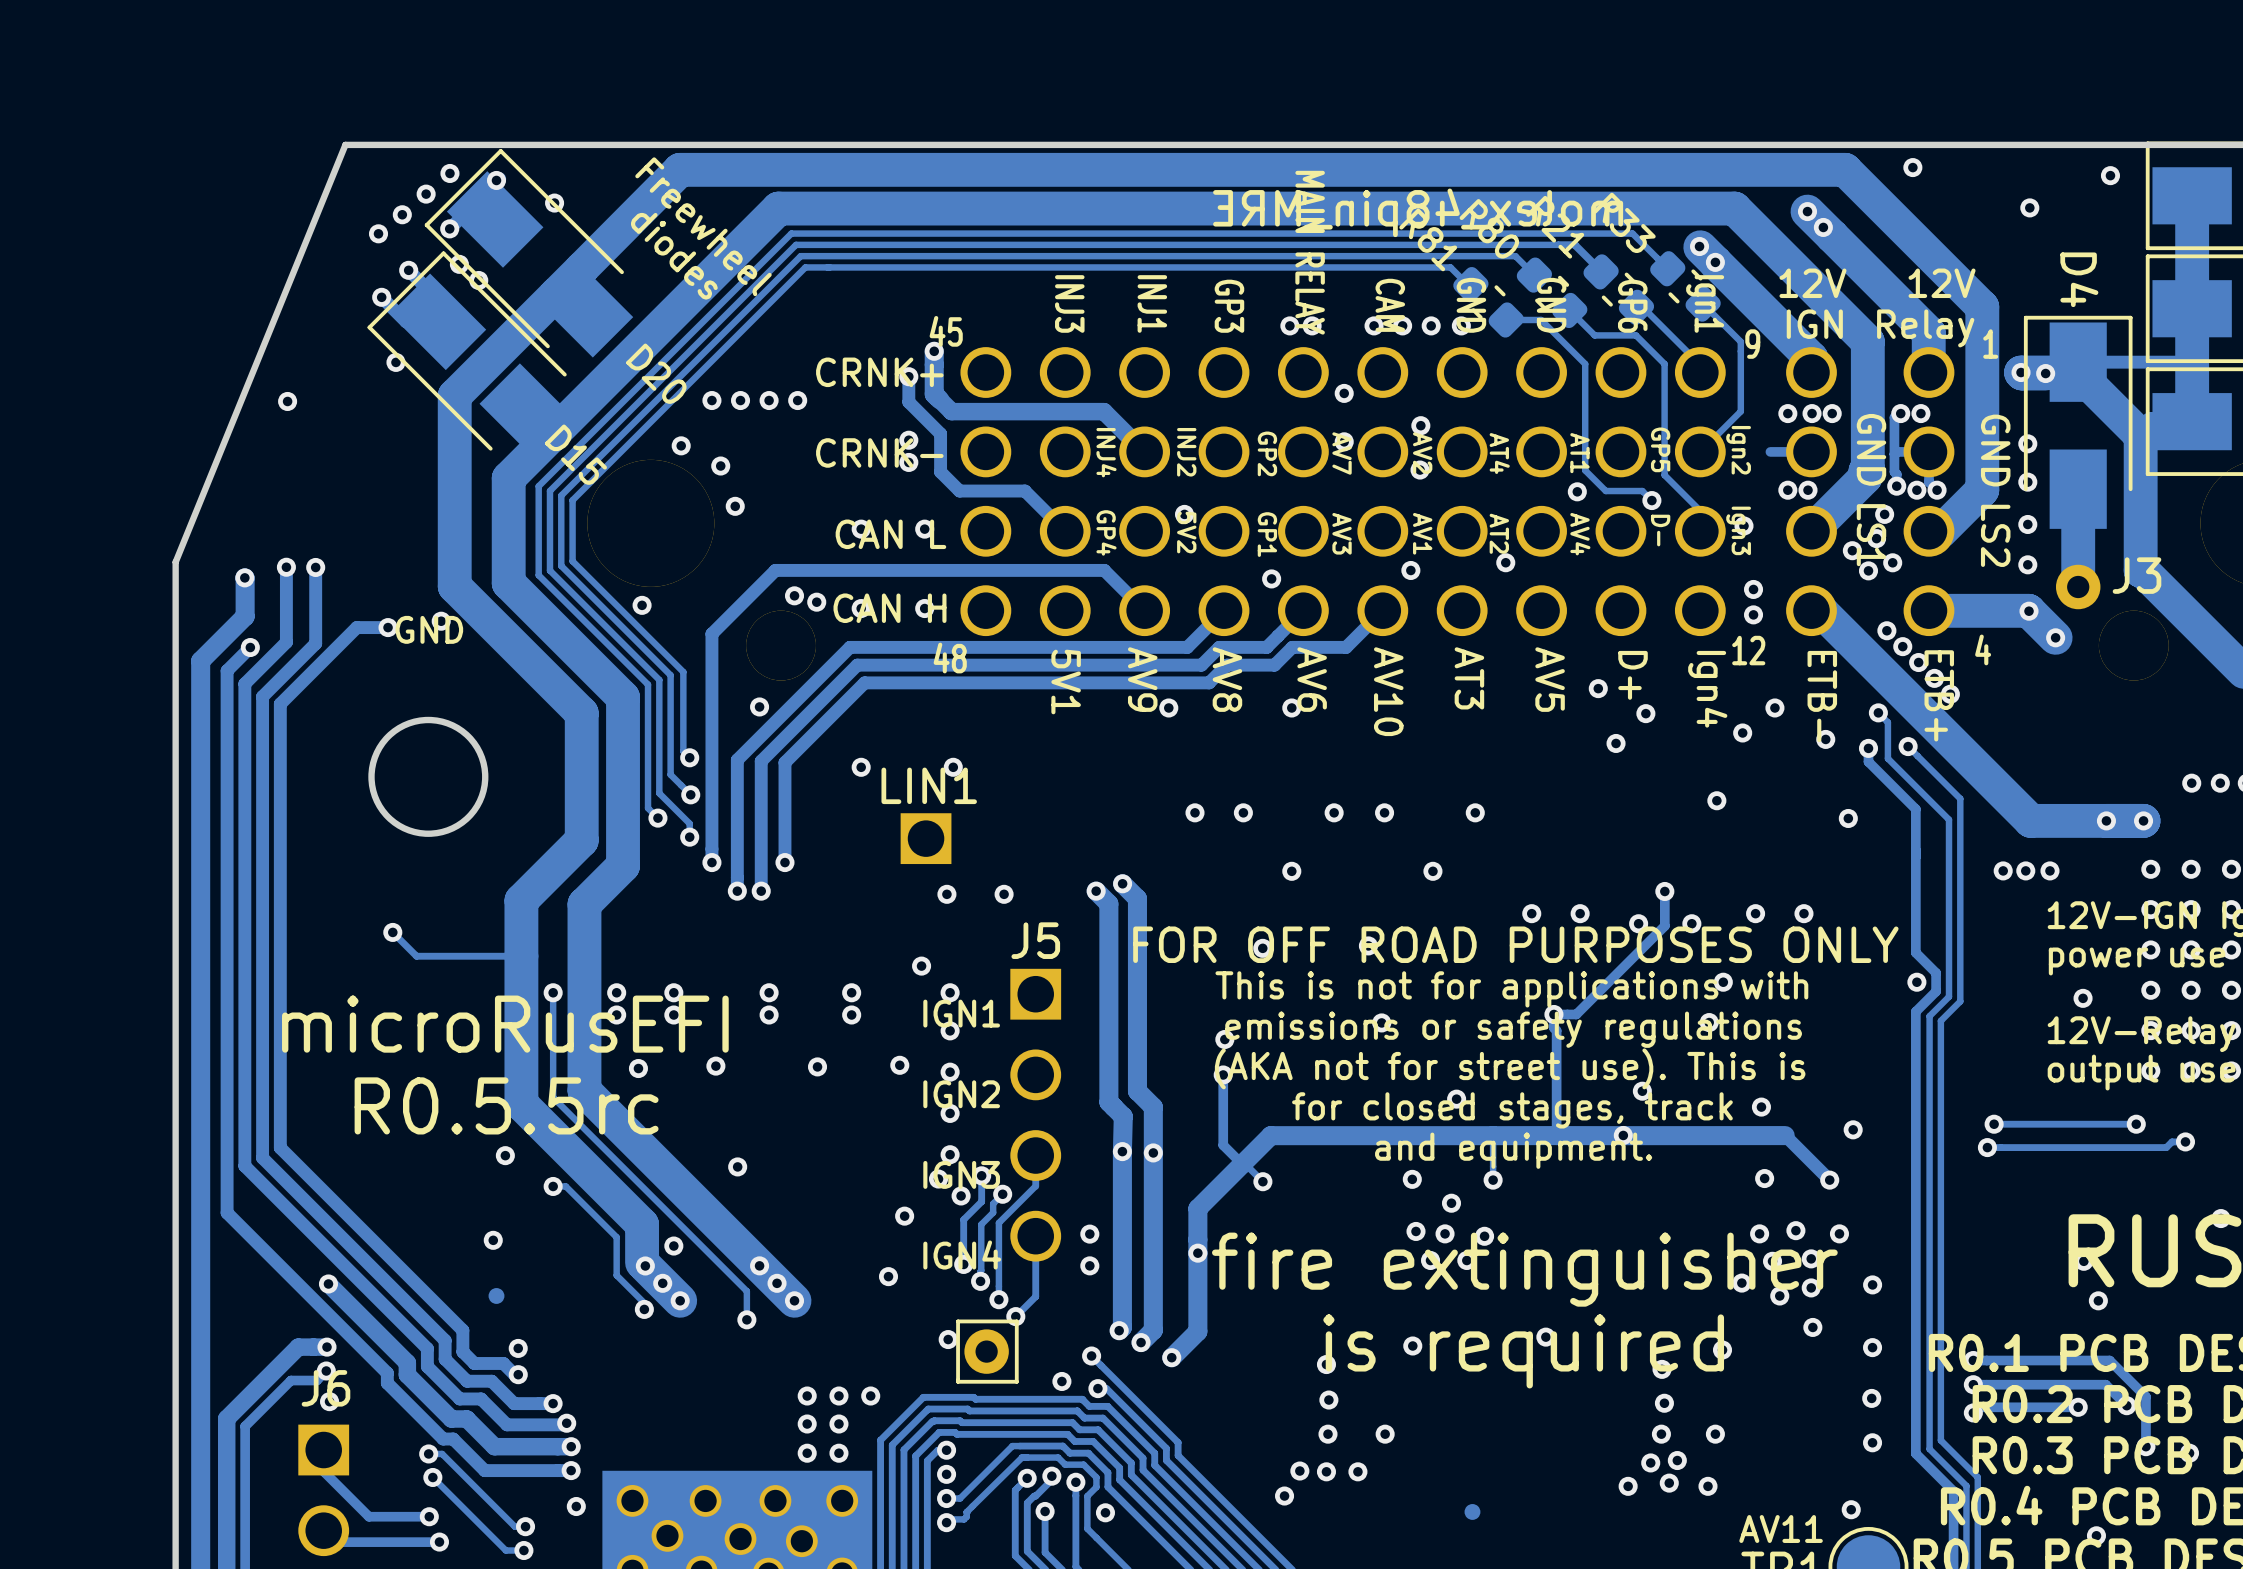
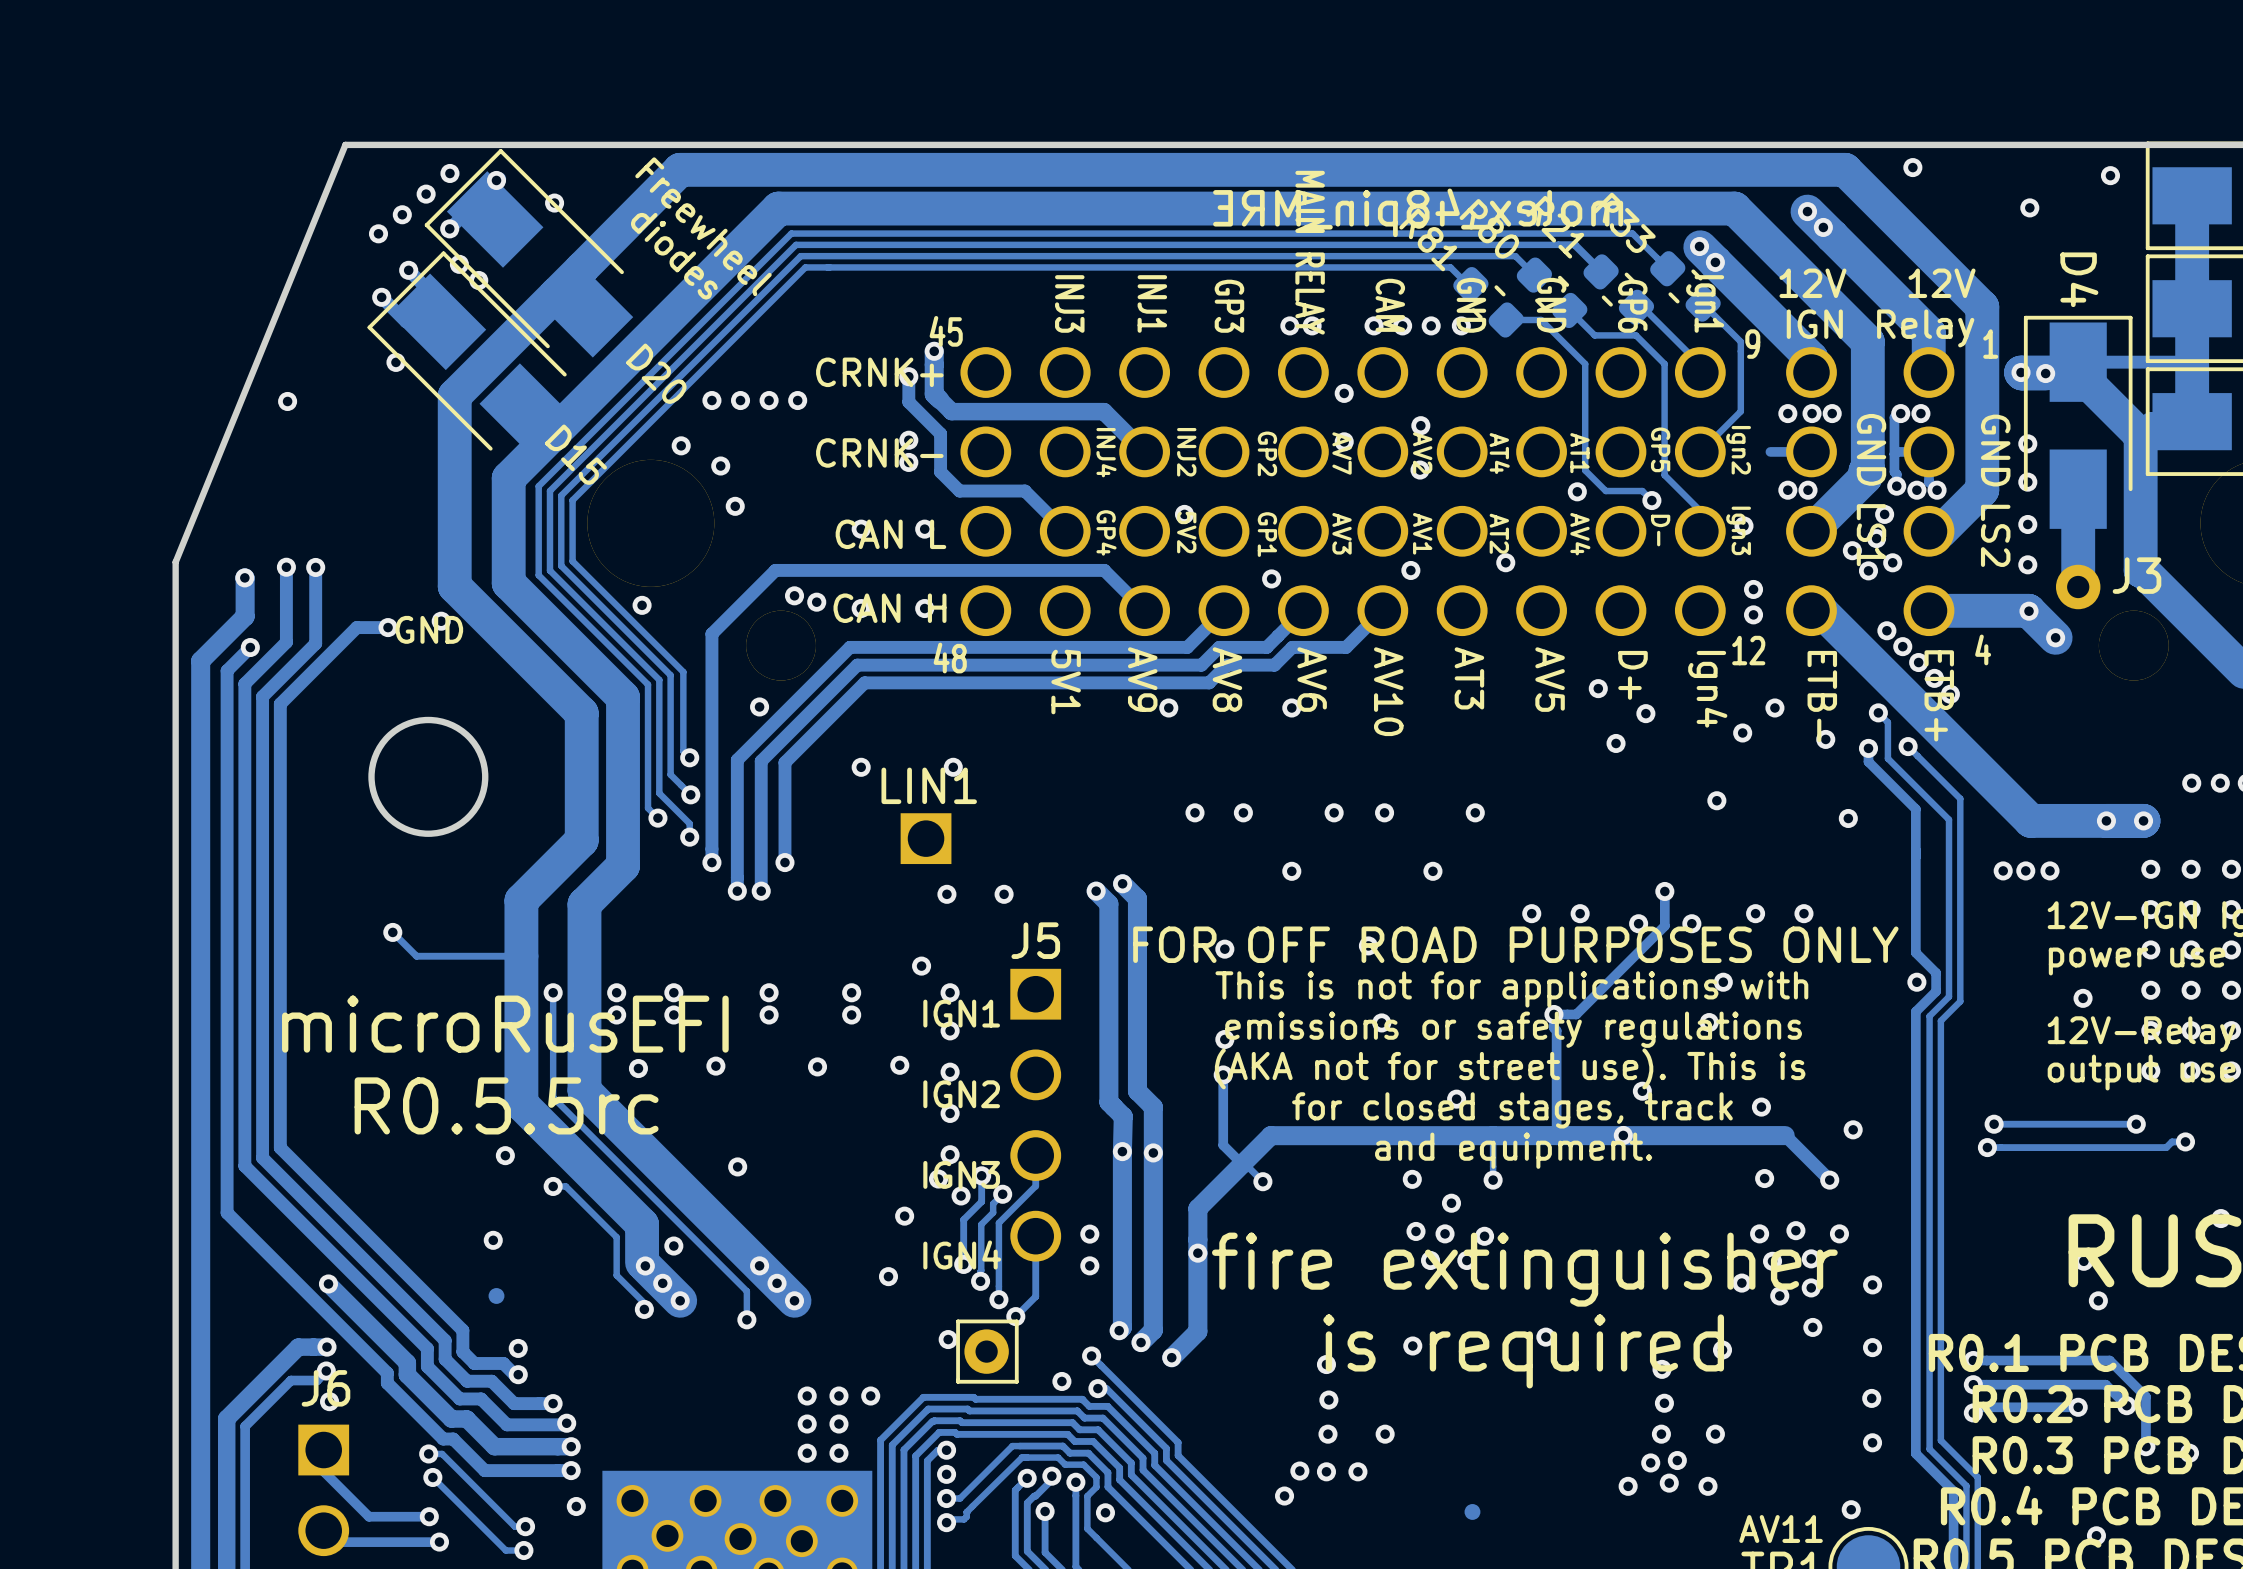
via position: (1262, 948) -> (1224, 949)

